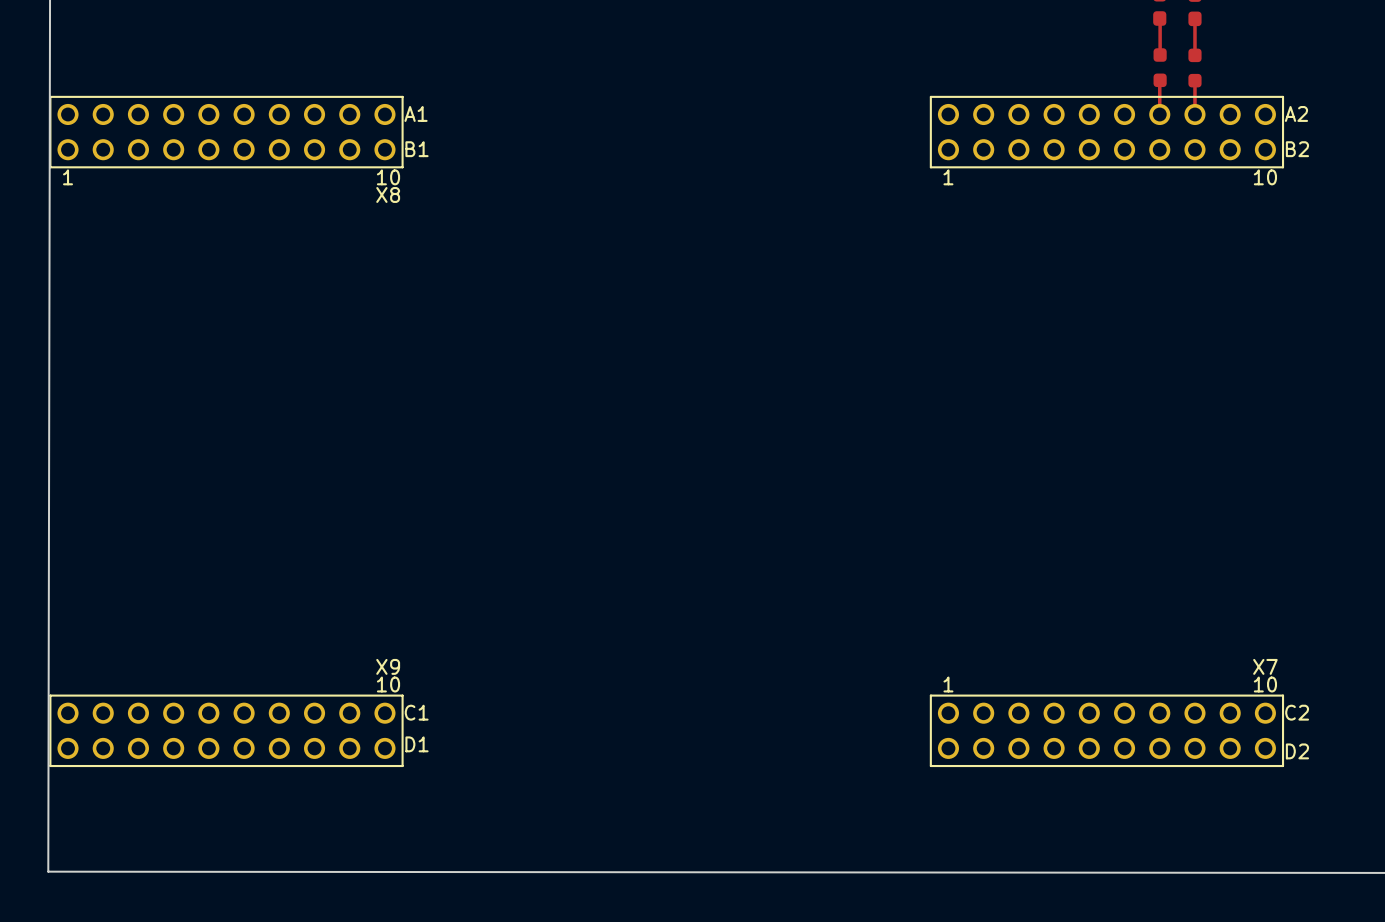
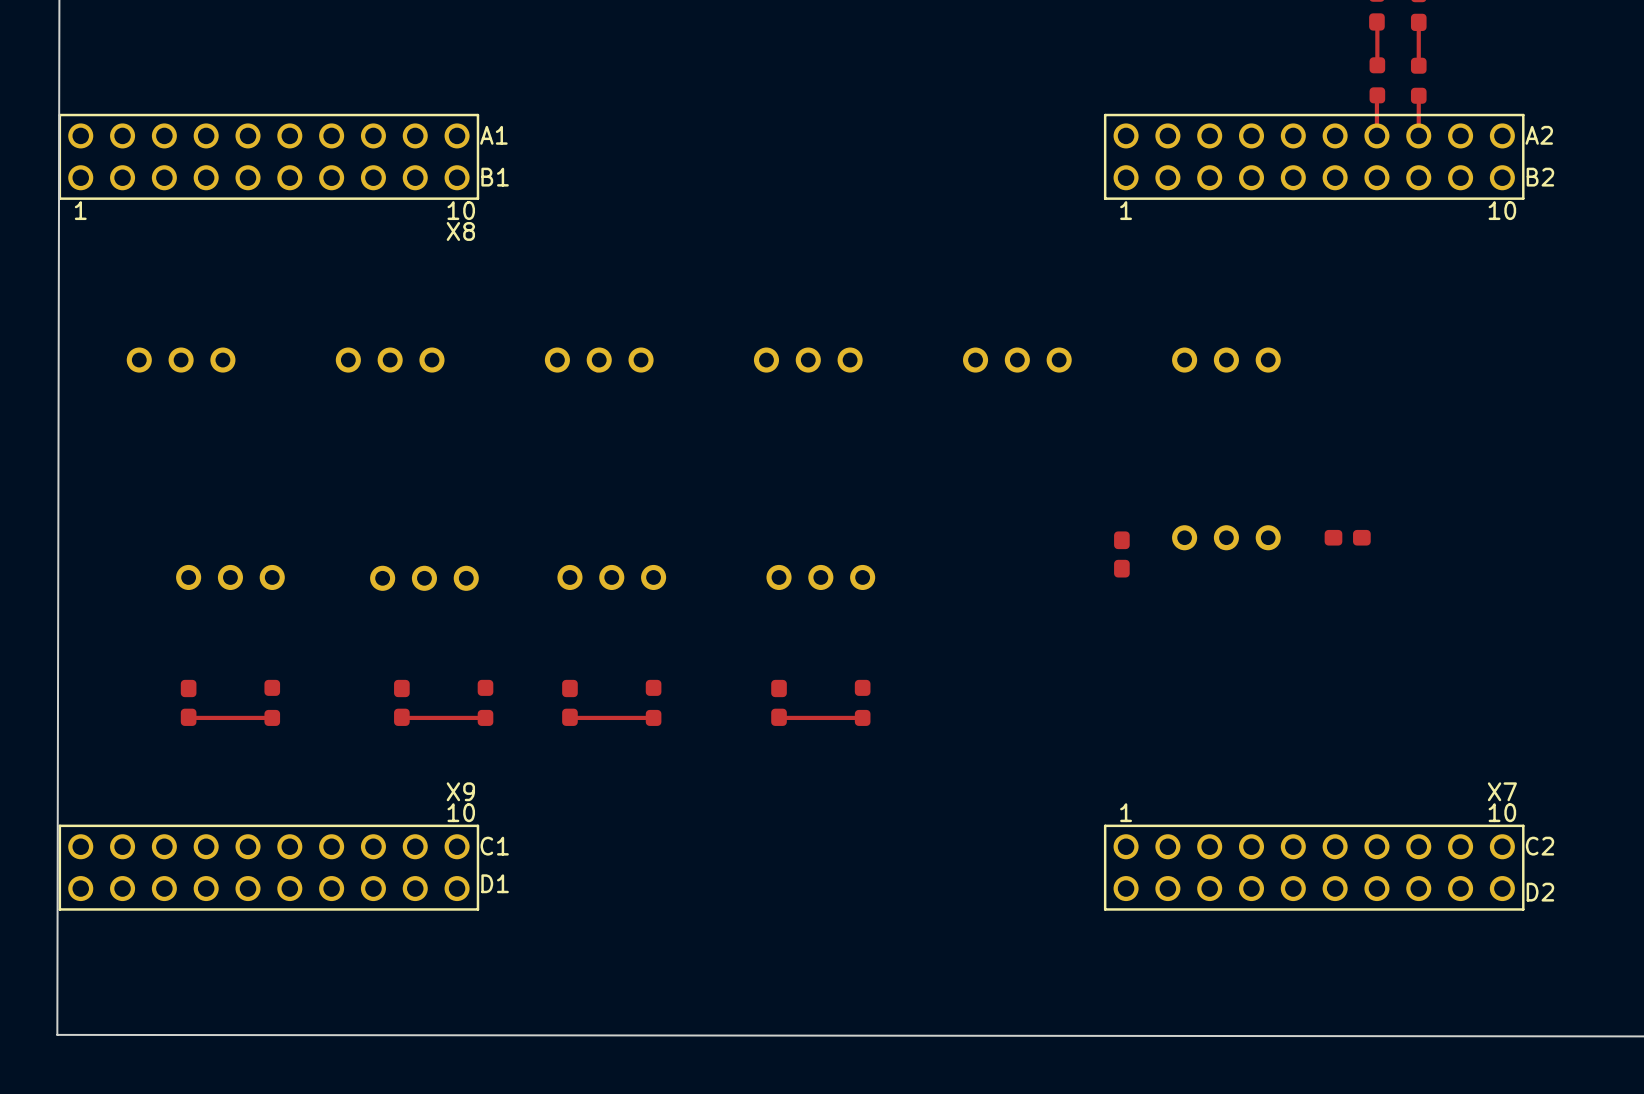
part: none -> (181, 360)
part: none -> (390, 360)
part: none -> (599, 360)
part: none -> (808, 360)
part: none -> (1017, 360)
part: none -> (1226, 360)
part: none -> (1226, 537)
part: none -> (1347, 537)
part: none -> (1121, 554)
part: none -> (230, 577)
part: none -> (611, 577)
part: none -> (820, 577)
part: none -> (424, 578)
part: none -> (188, 702)
part: none -> (272, 702)
part: none -> (401, 702)
part: none -> (485, 702)
part: none -> (569, 702)
part: none -> (653, 702)
part: none -> (779, 702)
part: none -> (862, 702)
top track: none -> (188, 717) (272, 717)
top track: none -> (401, 717) (485, 717)
top track: none -> (569, 717) (653, 717)
top track: none -> (779, 717) (862, 717)

